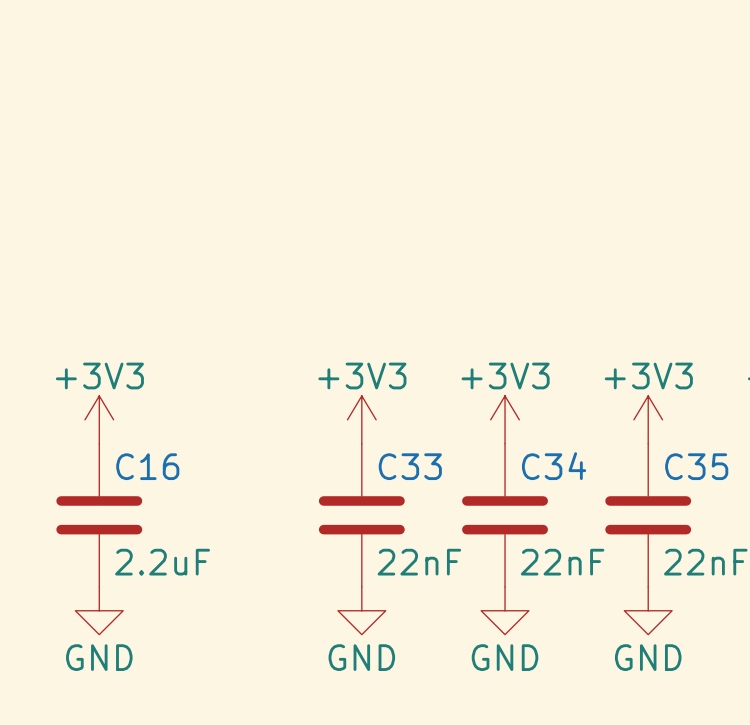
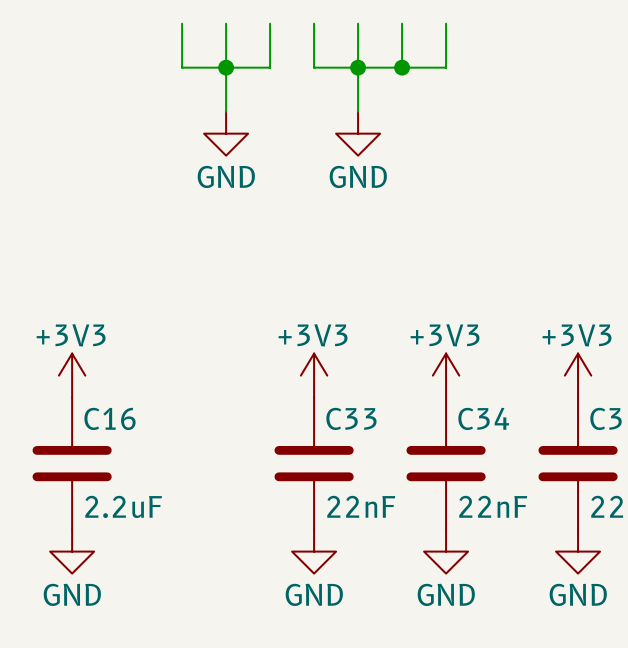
wire: none -> (182, 23) (182, 67) (270, 67) (270, 23)
wire: none -> (226, 23) (226, 111)
wire: none -> (314, 23) (314, 67) (446, 67) (446, 23)
wire: none -> (358, 23) (358, 111)
wire: none -> (402, 23) (402, 67)
junction: none -> (226, 67)
junction: none -> (358, 67)
junction: none -> (402, 67)
power symbol: none -> GND (226, 133)
power symbol: none -> GND (358, 133)

